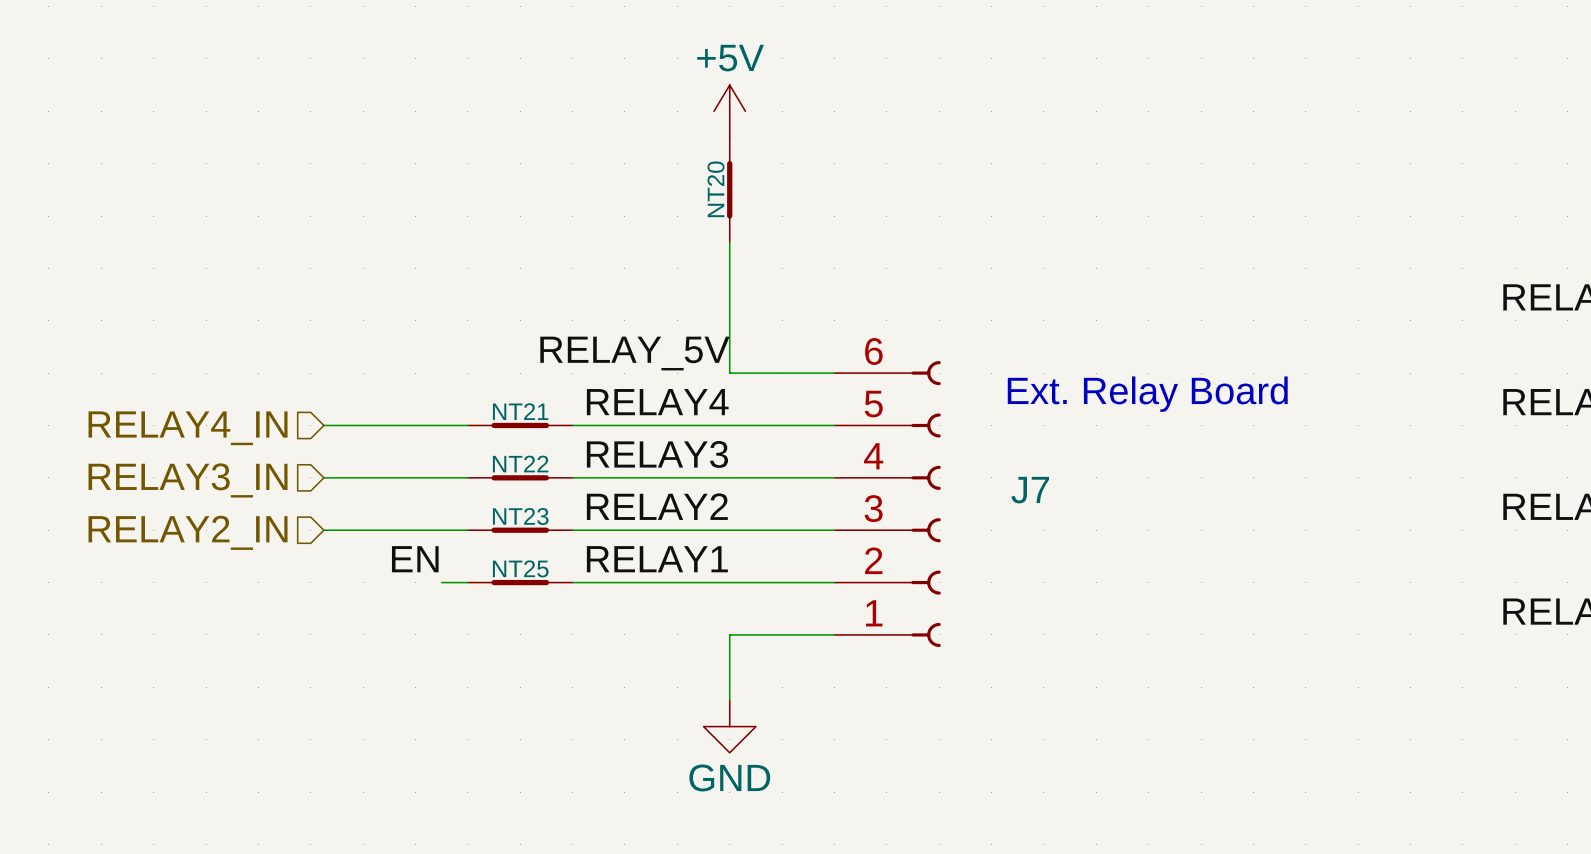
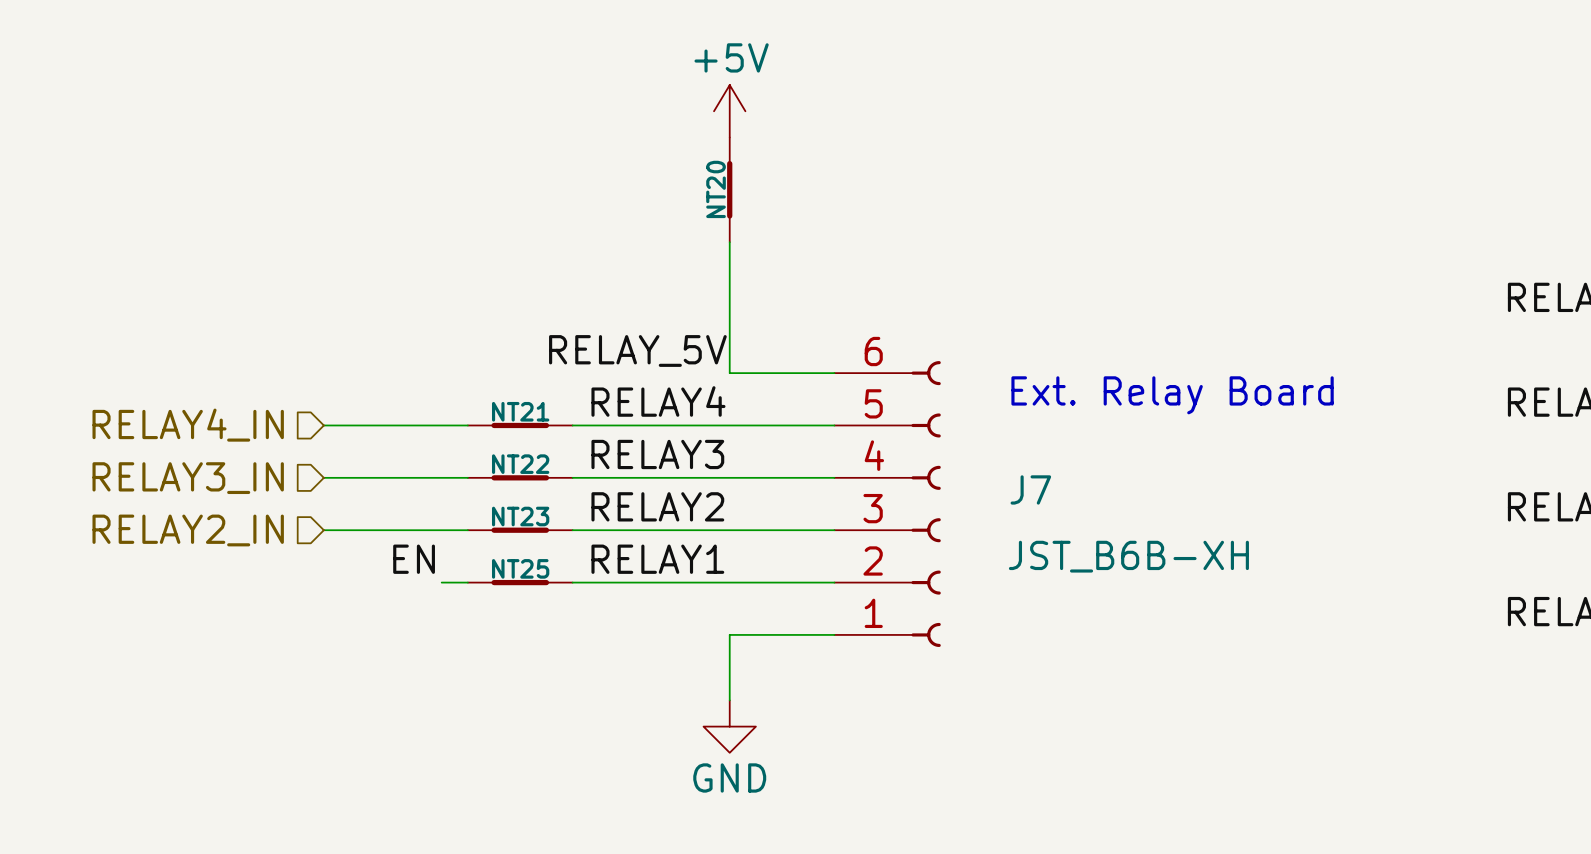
J7 value: none -> JST_B6B-XH (1128, 556)

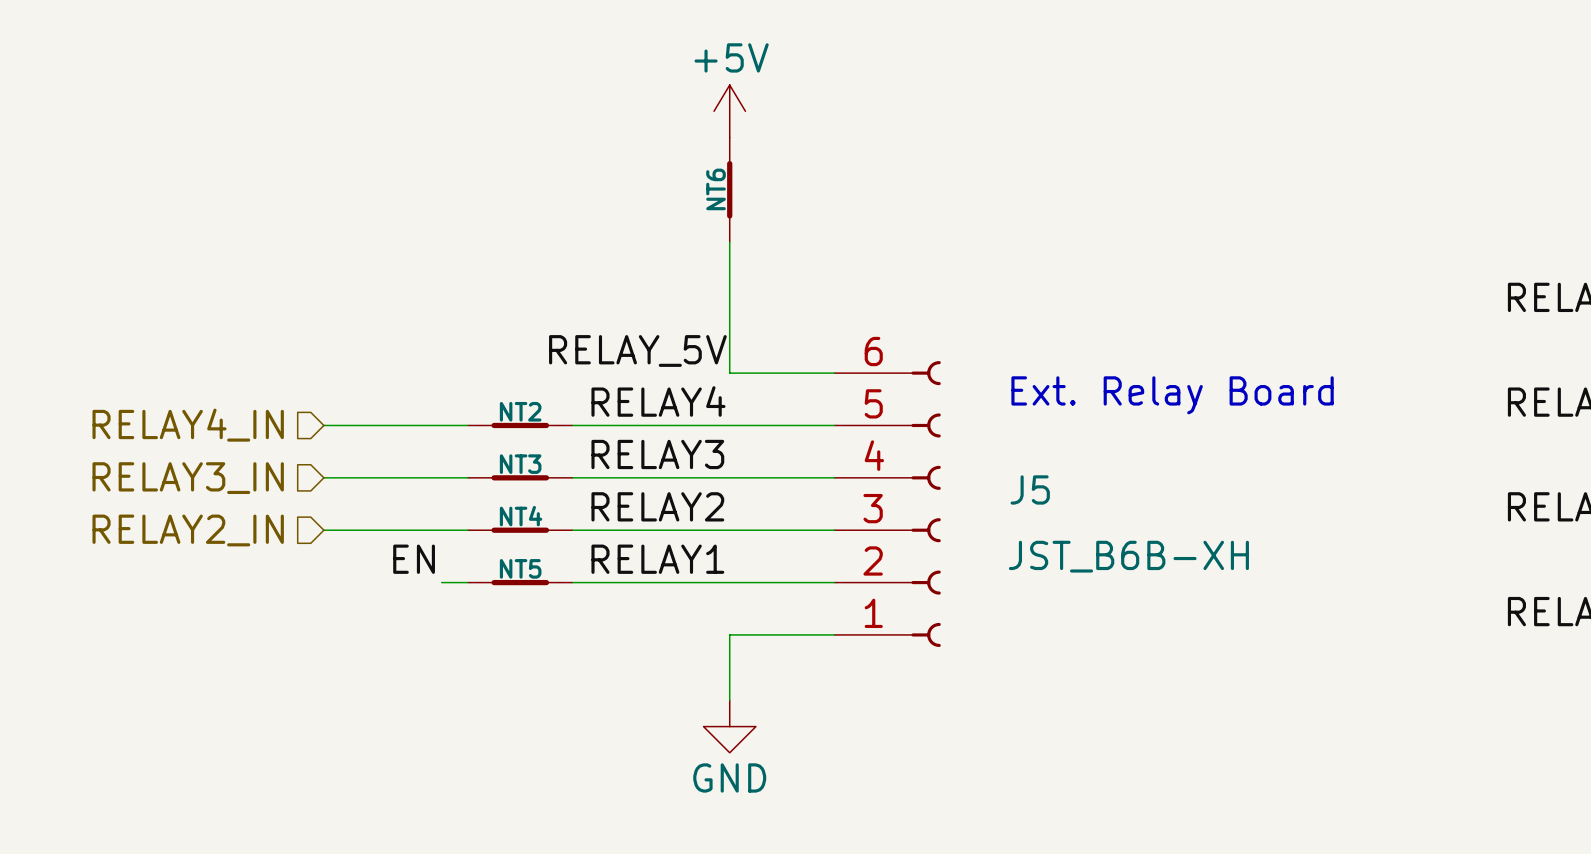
NT20 name: NT20 (716, 189) -> NT6 (716, 189)
NT21 name: NT21 (520, 411) -> NT2 (520, 411)
NT22 name: NT22 (520, 464) -> NT3 (520, 464)
J7 name: J7 (1030, 489) -> J5 (1030, 489)
NT23 name: NT23 (520, 516) -> NT4 (521, 516)
NT25 name: NT25 (520, 568) -> NT5 (520, 568)

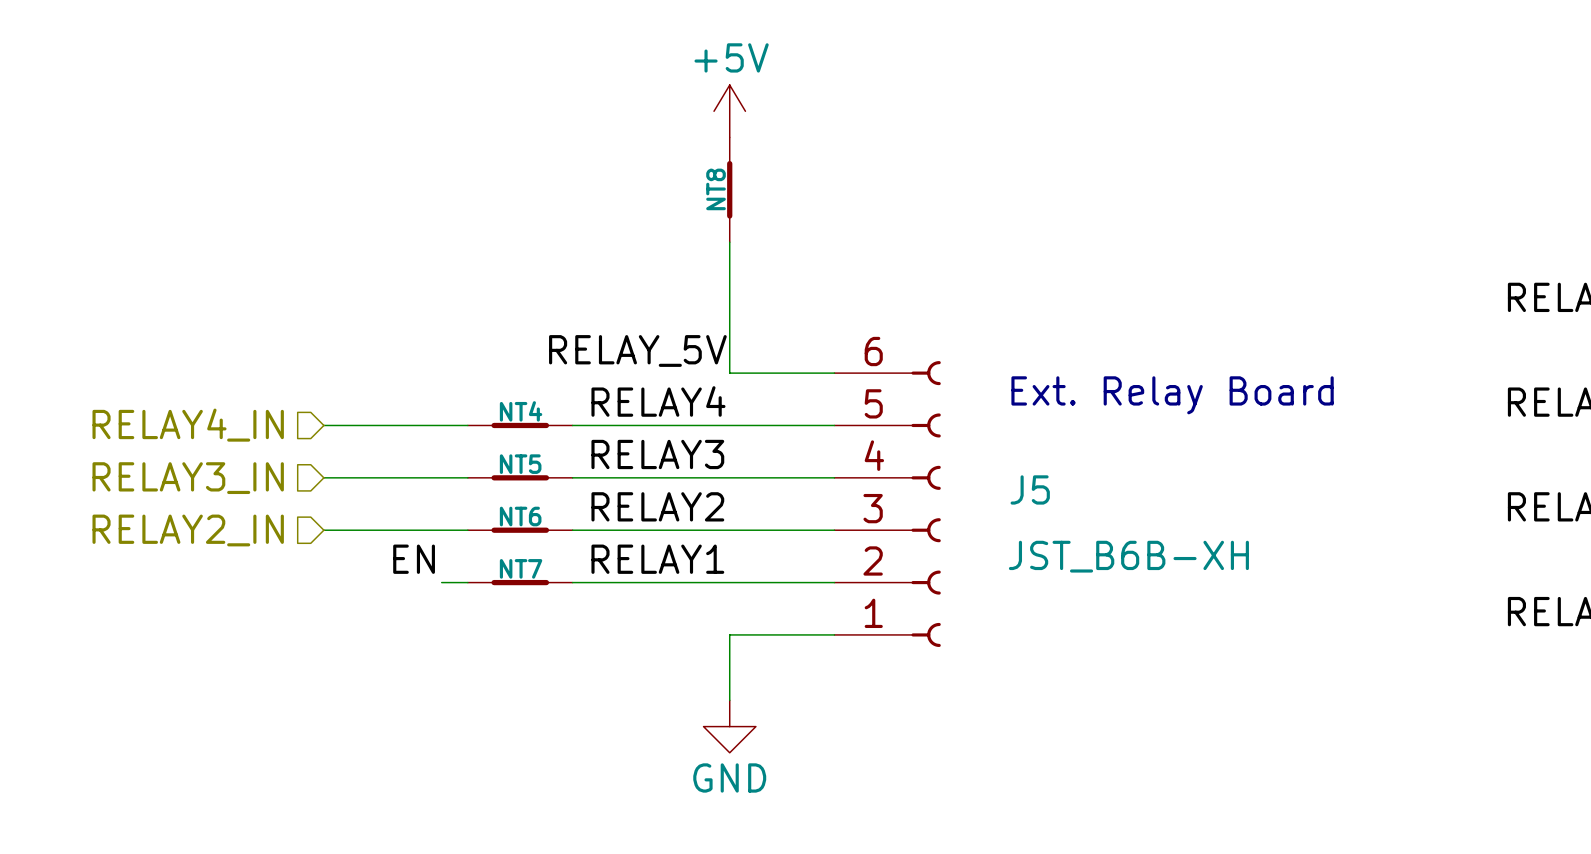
NT6 name: NT6 (716, 189) -> NT8 (716, 189)
NT2 name: NT2 (520, 411) -> NT4 (521, 411)
NT3 name: NT3 (520, 464) -> NT5 (520, 464)
NT4 name: NT4 (521, 516) -> NT6 (520, 516)
NT5 name: NT5 (520, 568) -> NT7 (521, 568)

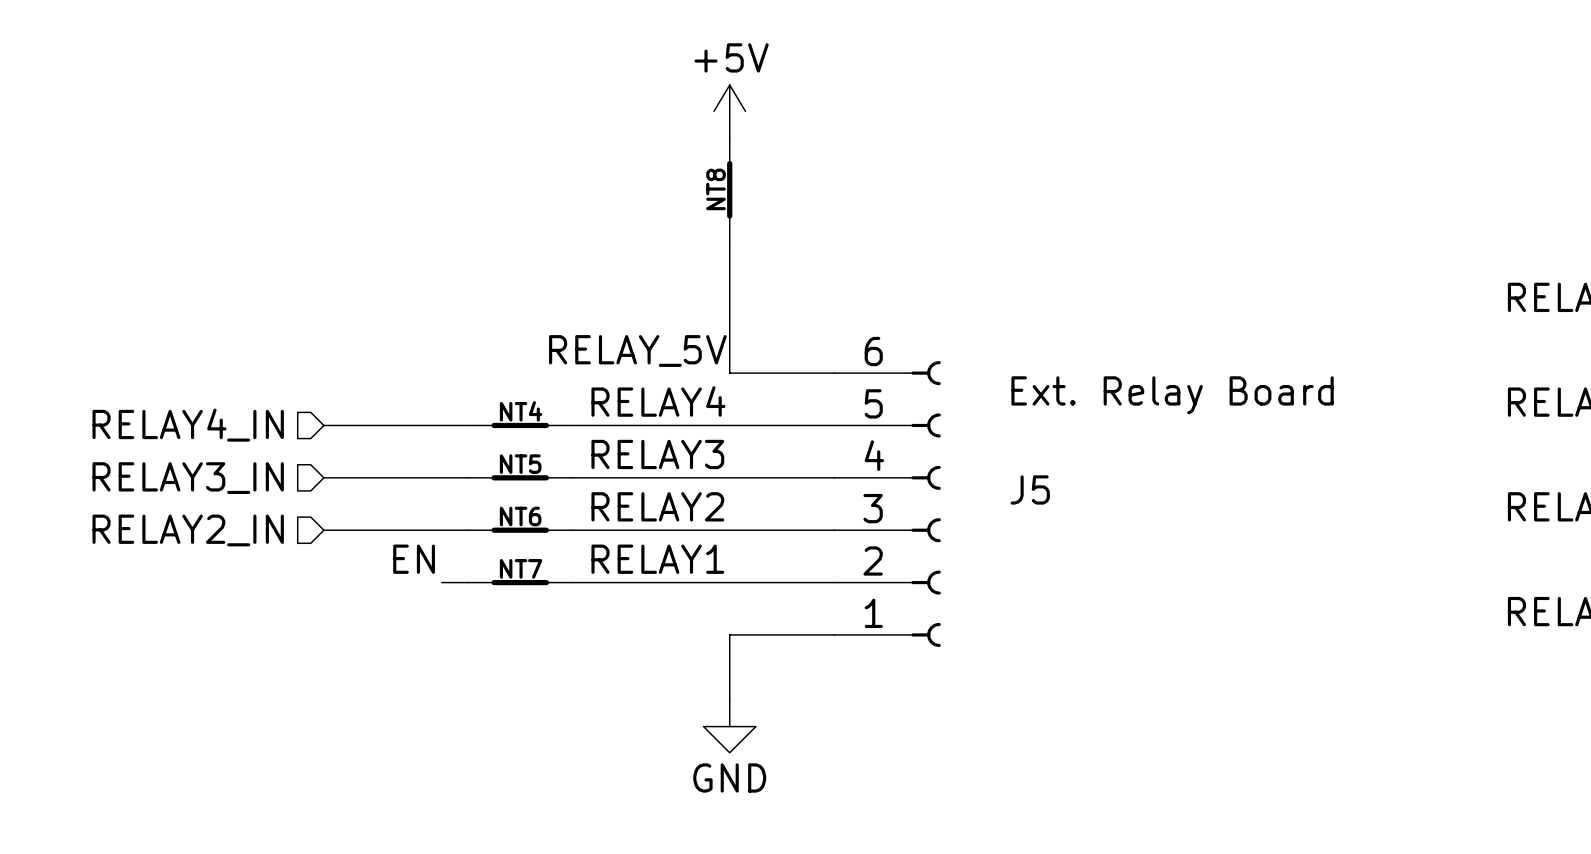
J5 value: JST_B6B-XH (1128, 556) -> none

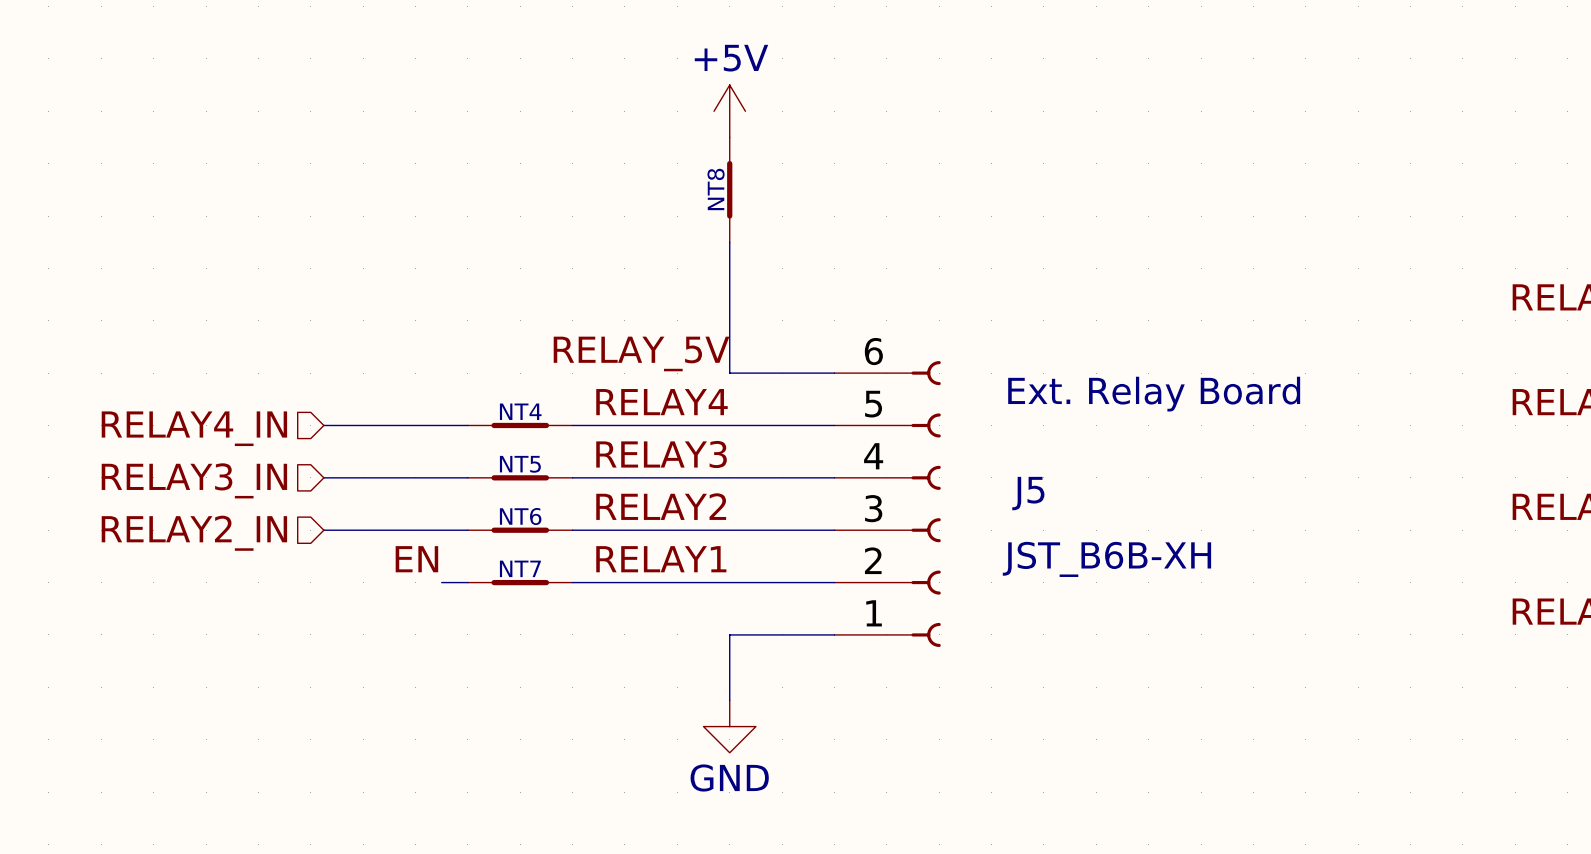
J5 value: none -> JST_B6B-XH (1106, 559)

